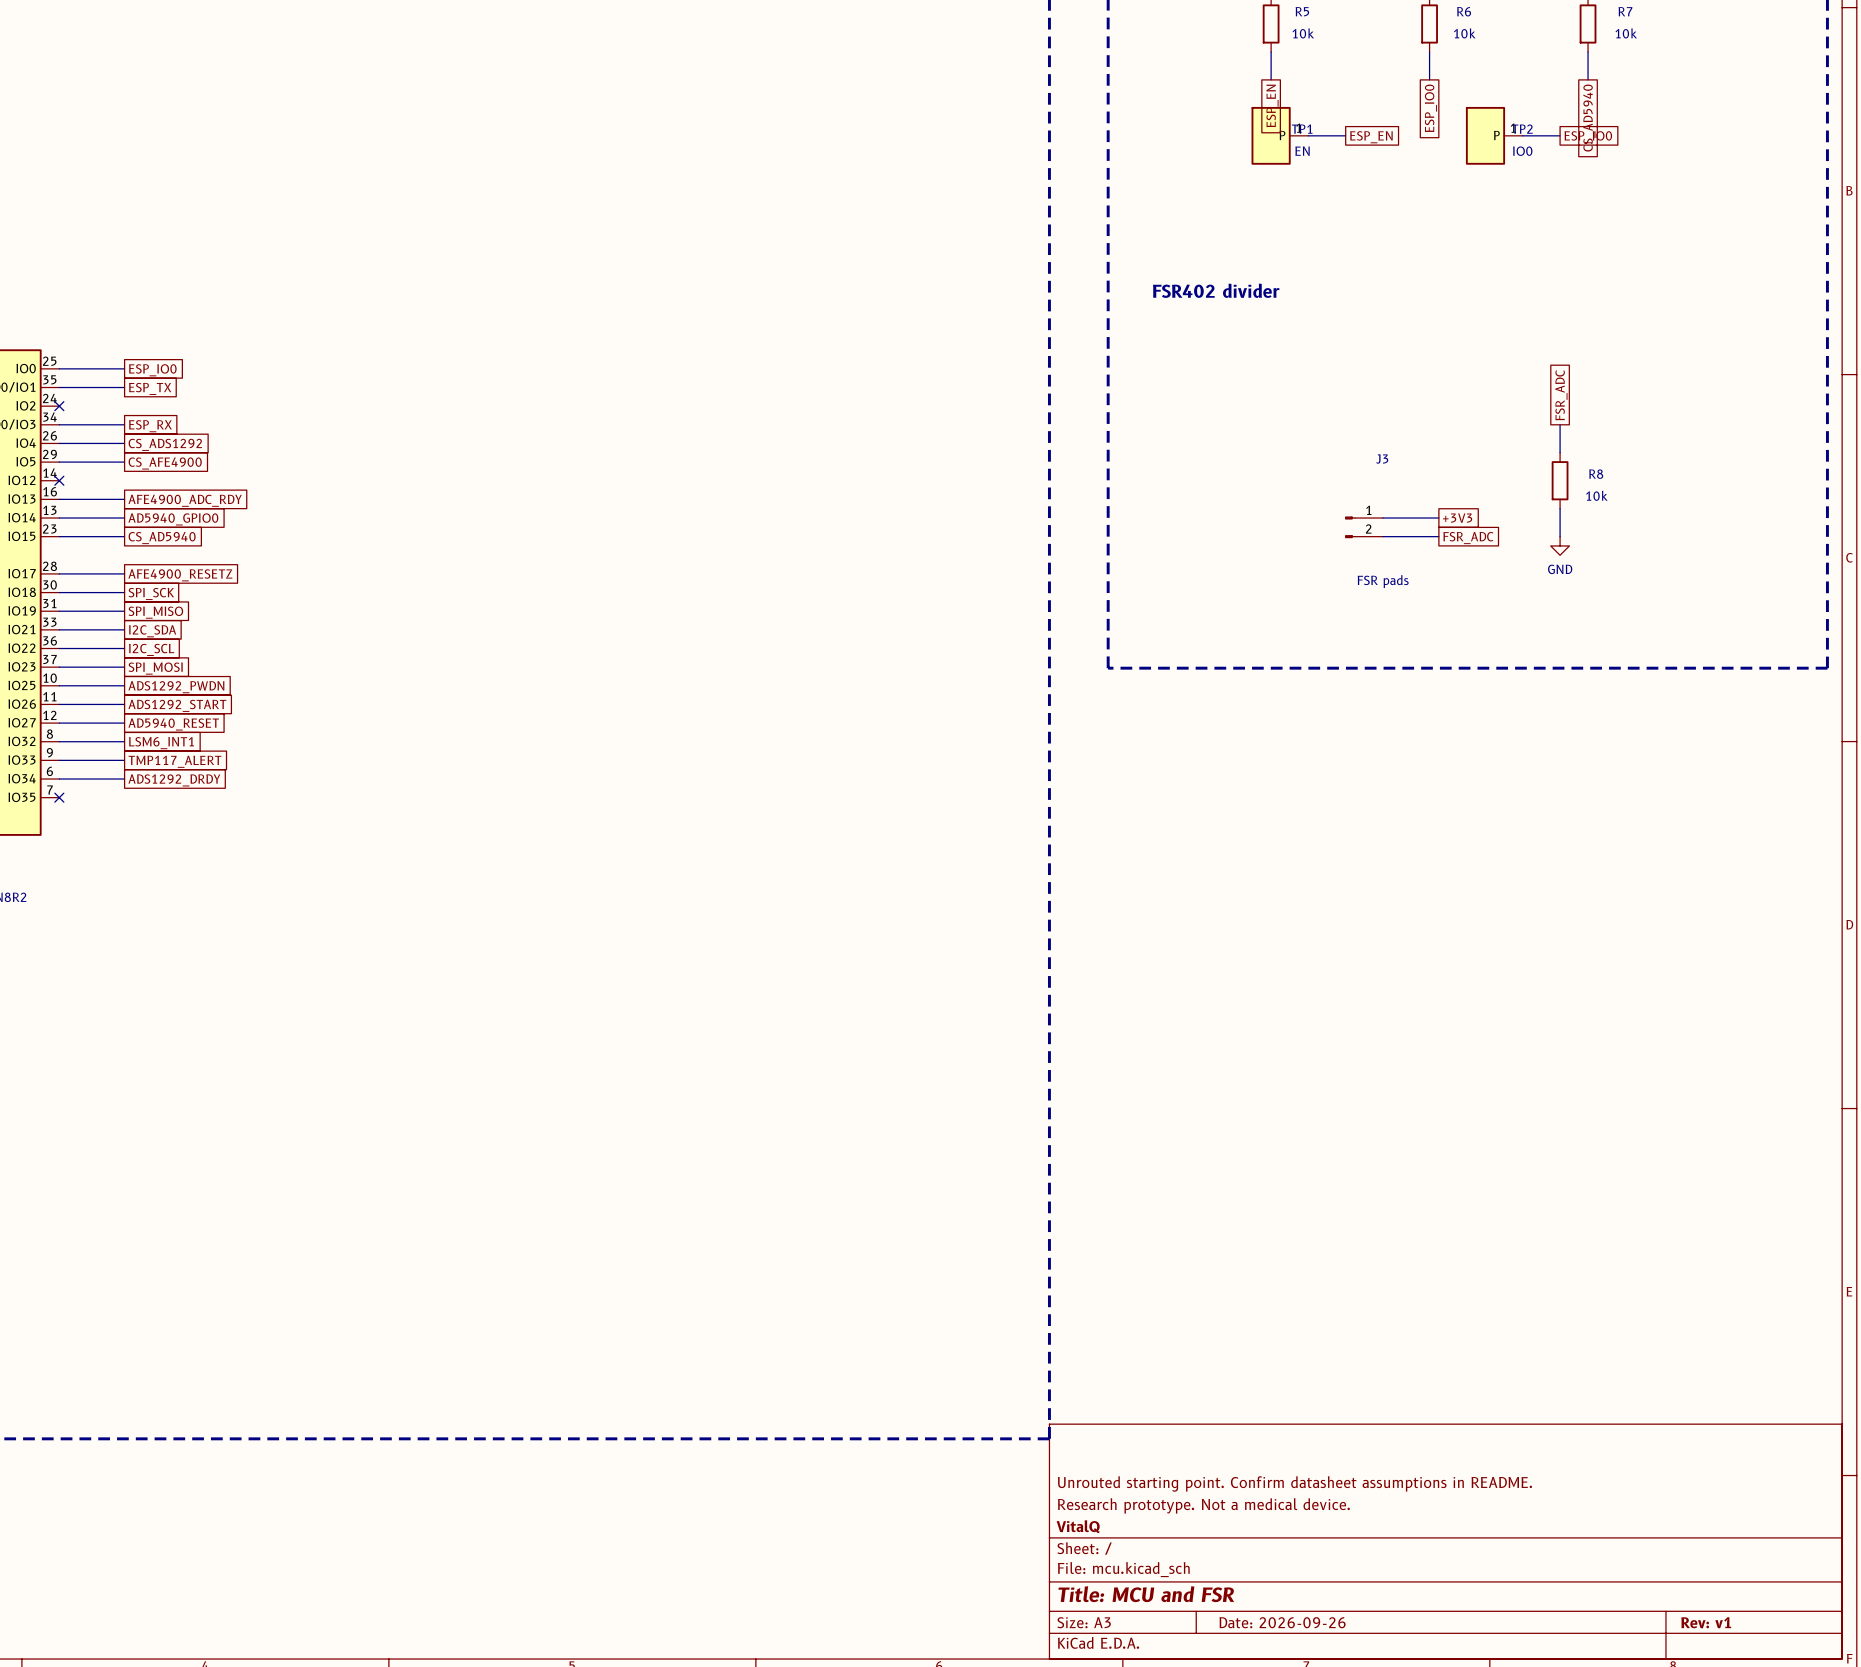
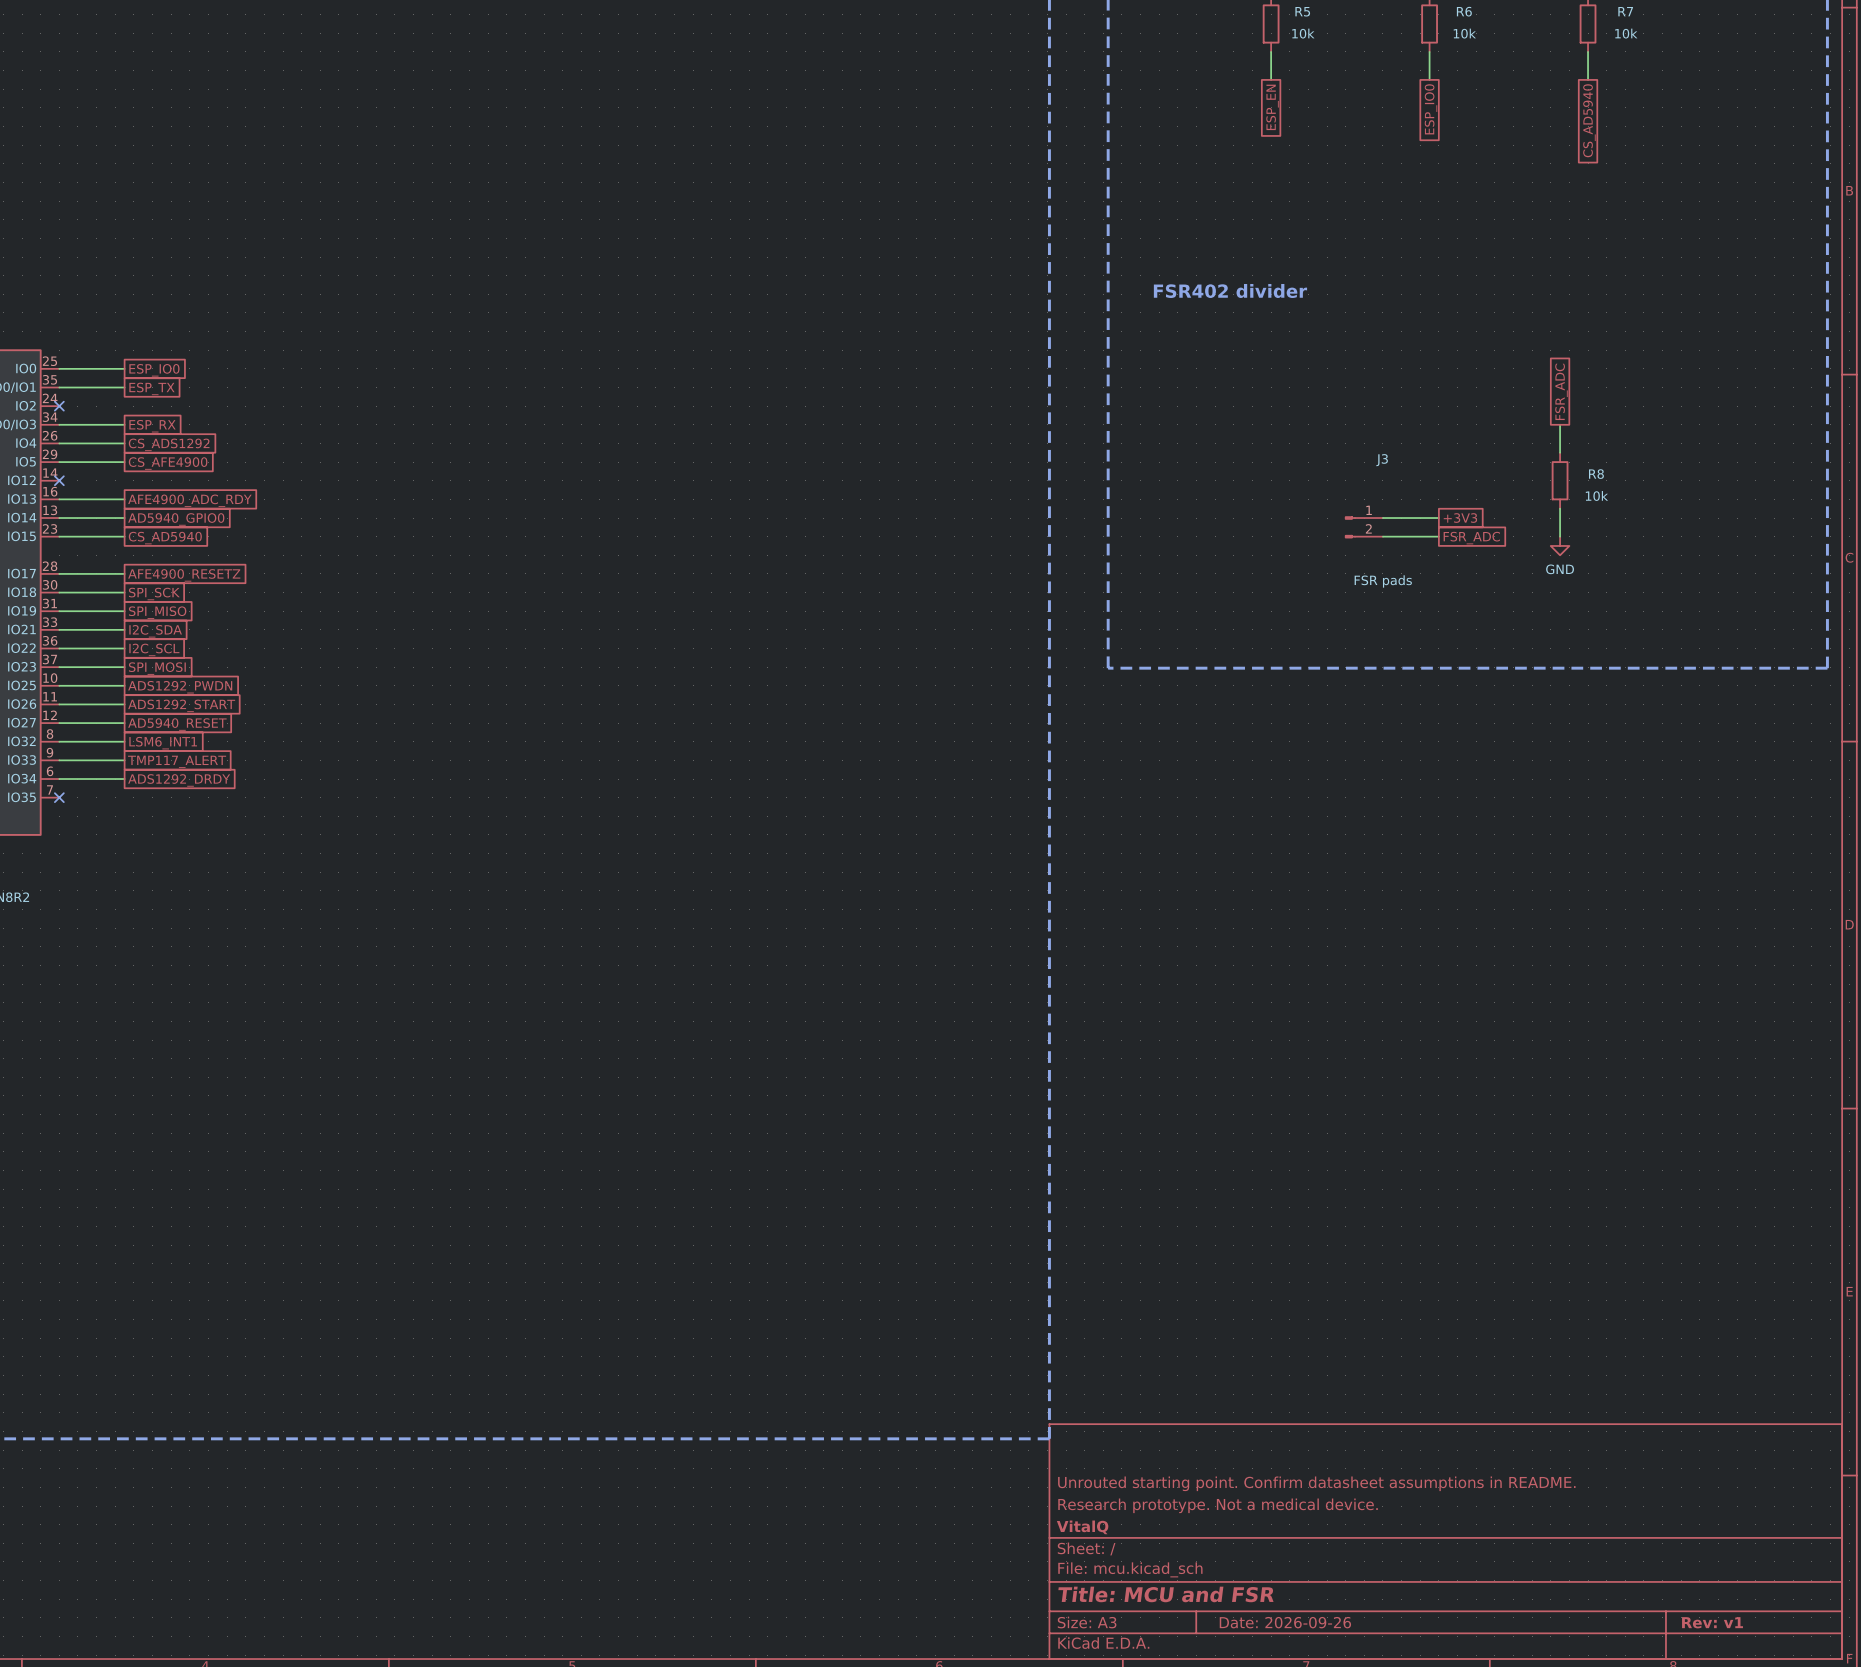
TP1: EN (1279, 135) -> none
wire: (1308, 135) (1345, 135) -> none
TP2: IO0 (1494, 135) -> none
wire: (1522, 135) (1560, 135) -> none
global label: ESP_EN (1371, 137) -> none
global label: ESP_IO0 (1588, 137) -> none

